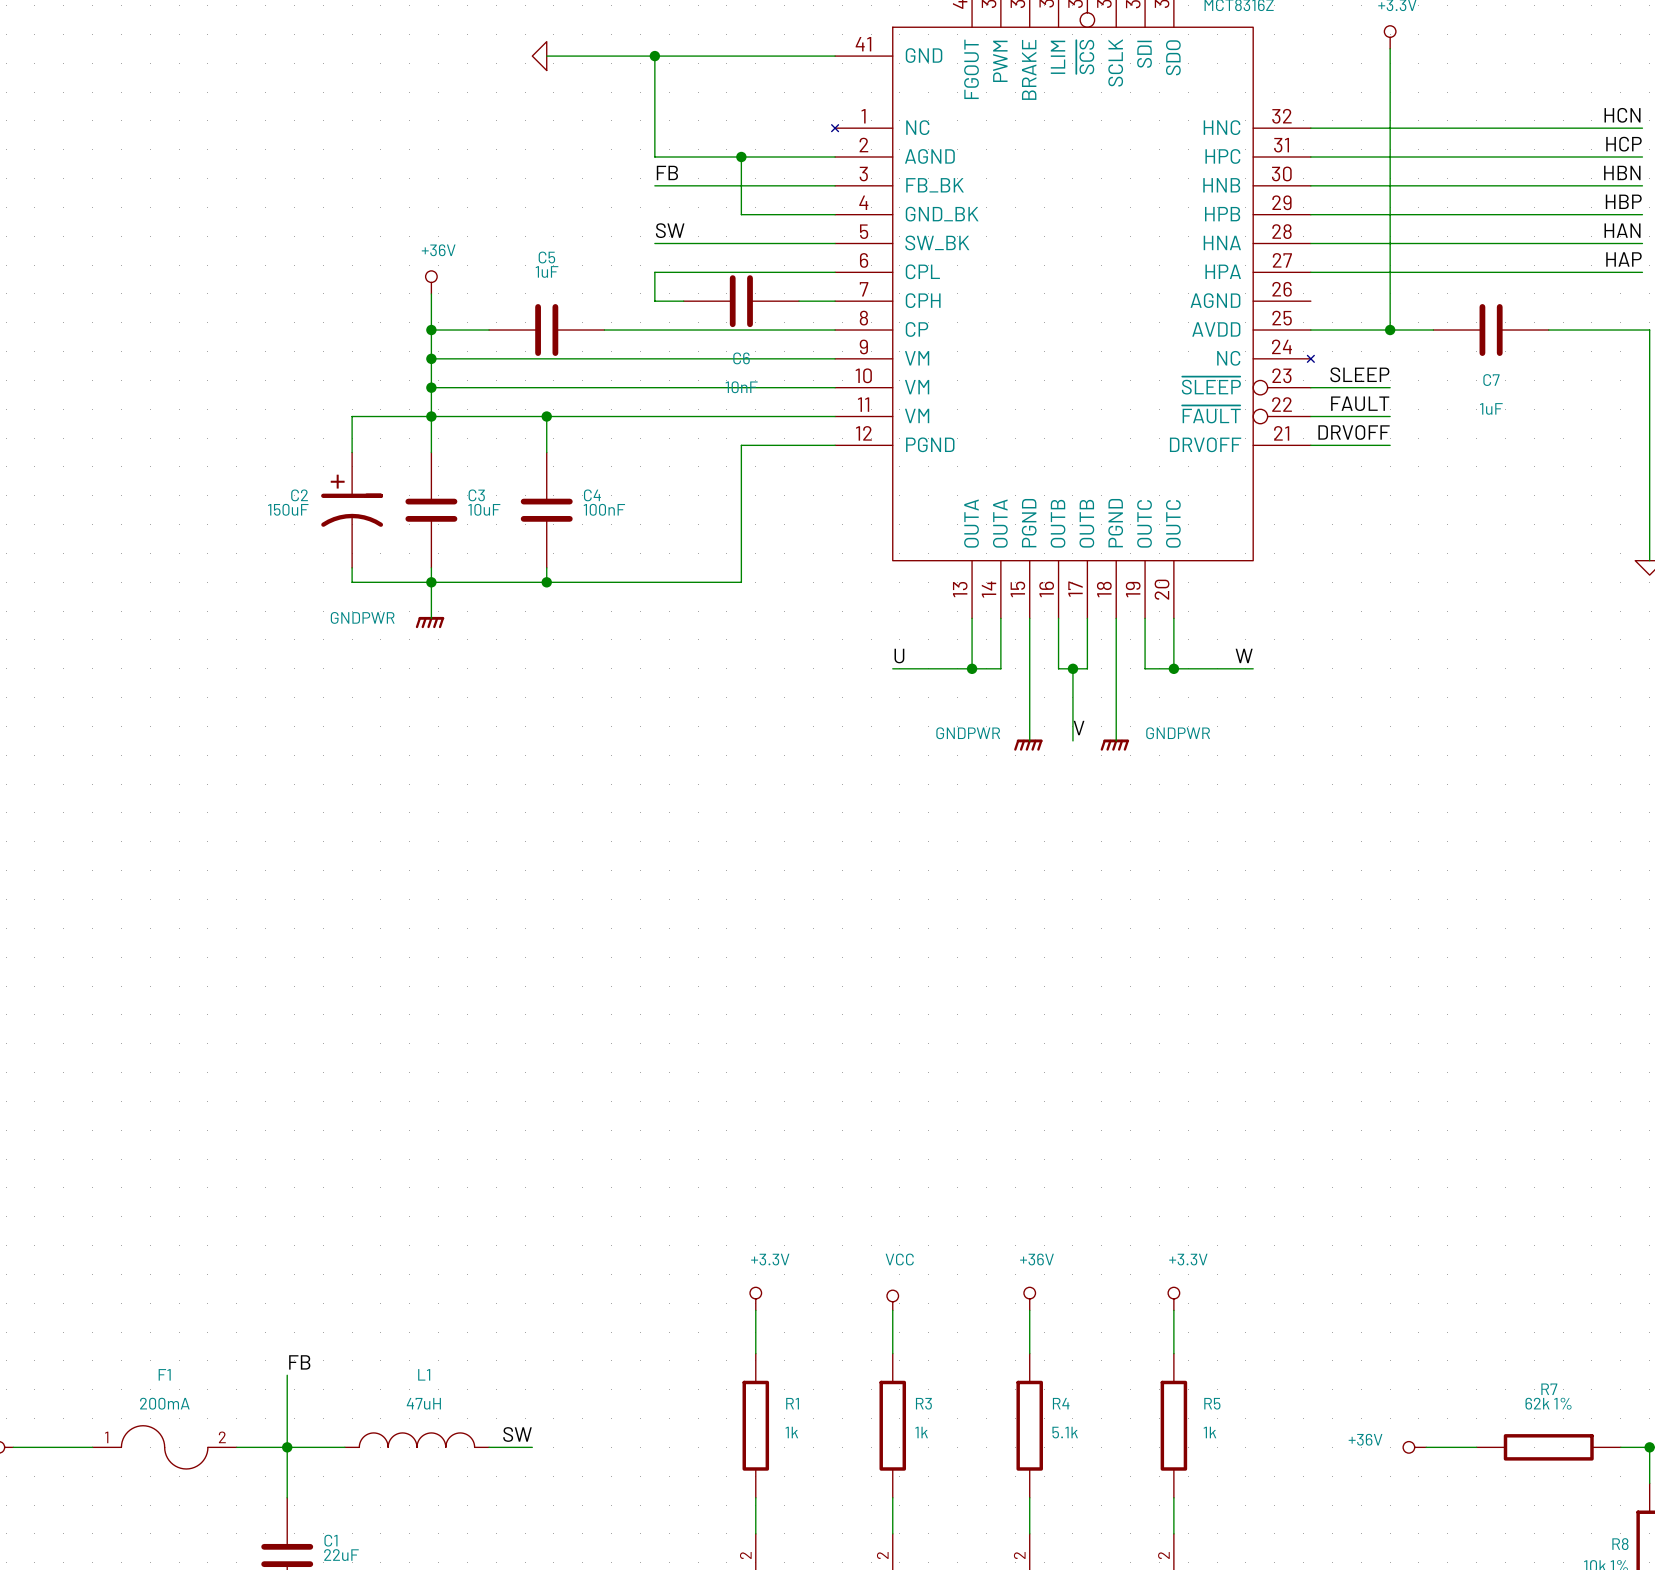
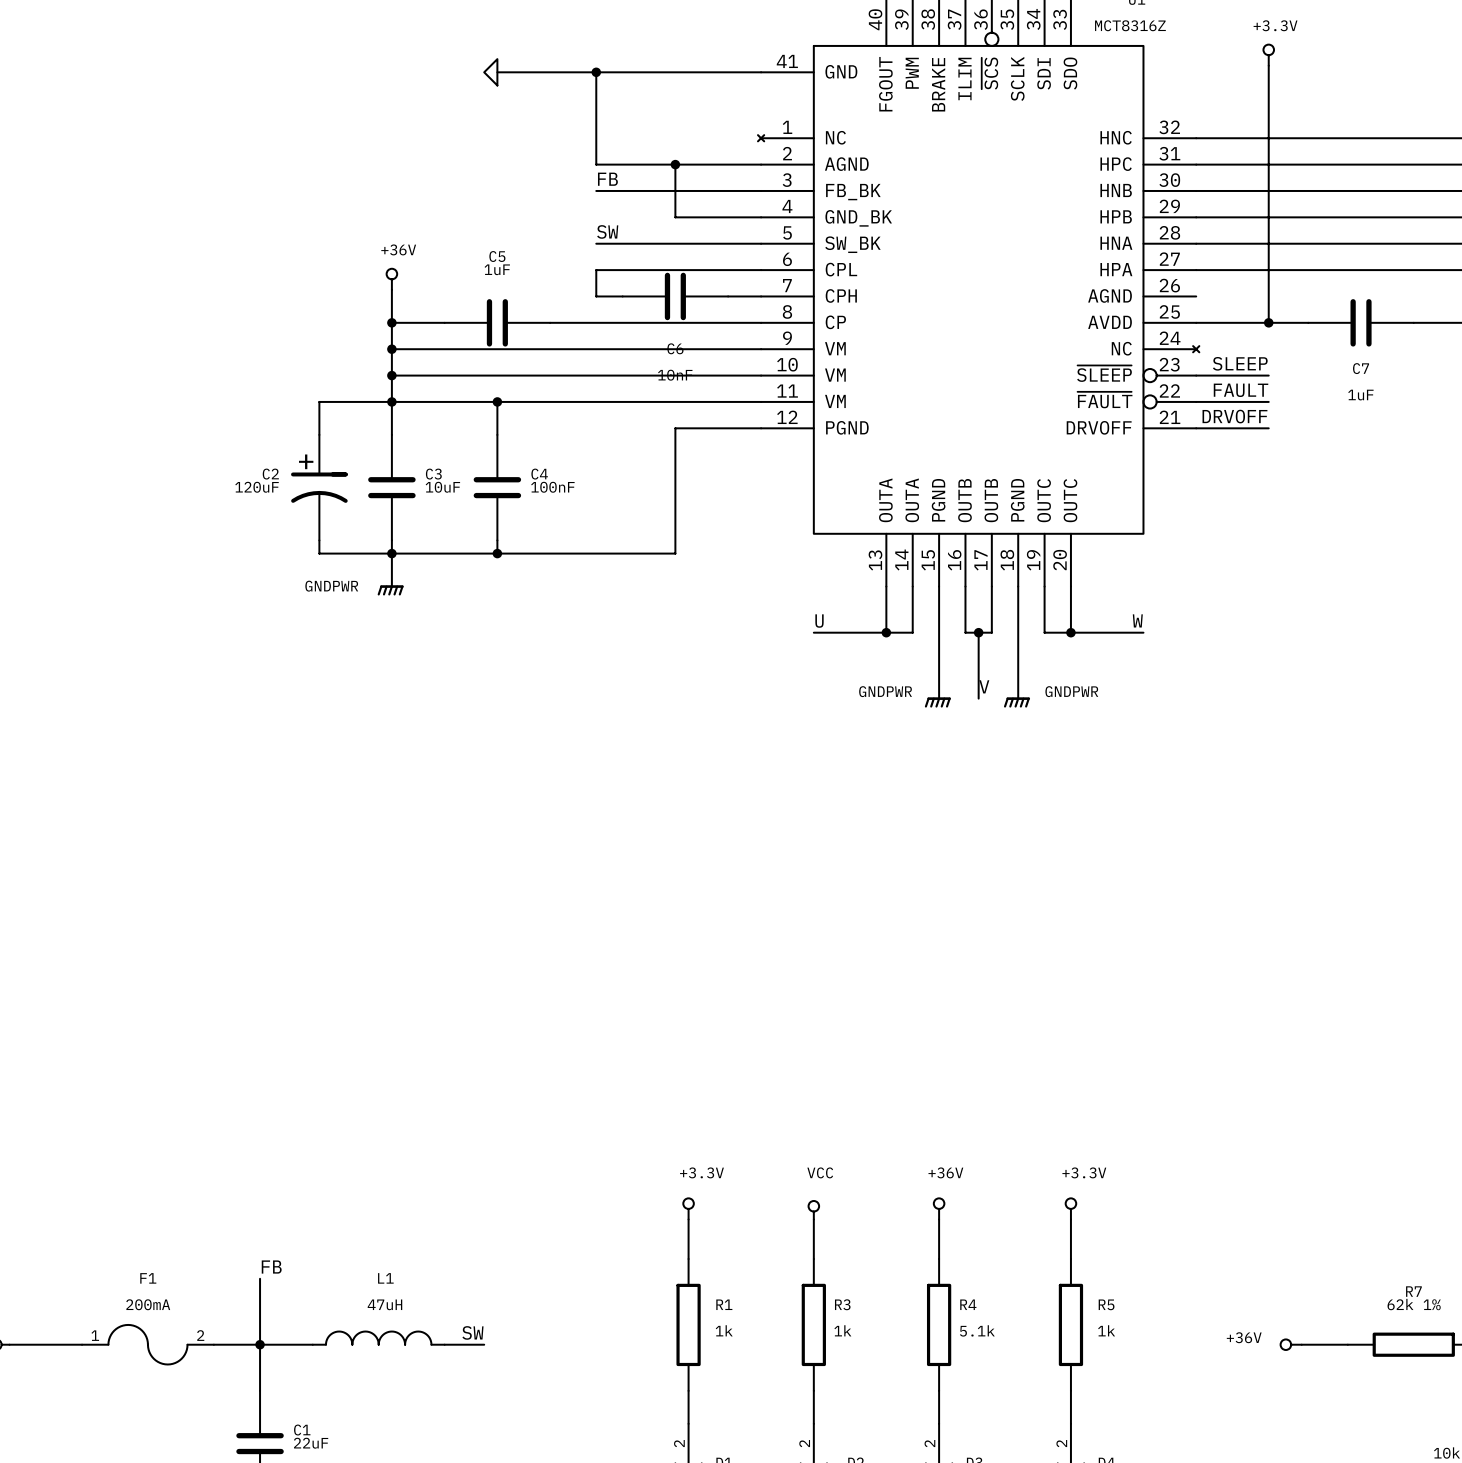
C2 value: 150uF (288, 509) -> 120uF (257, 487)

